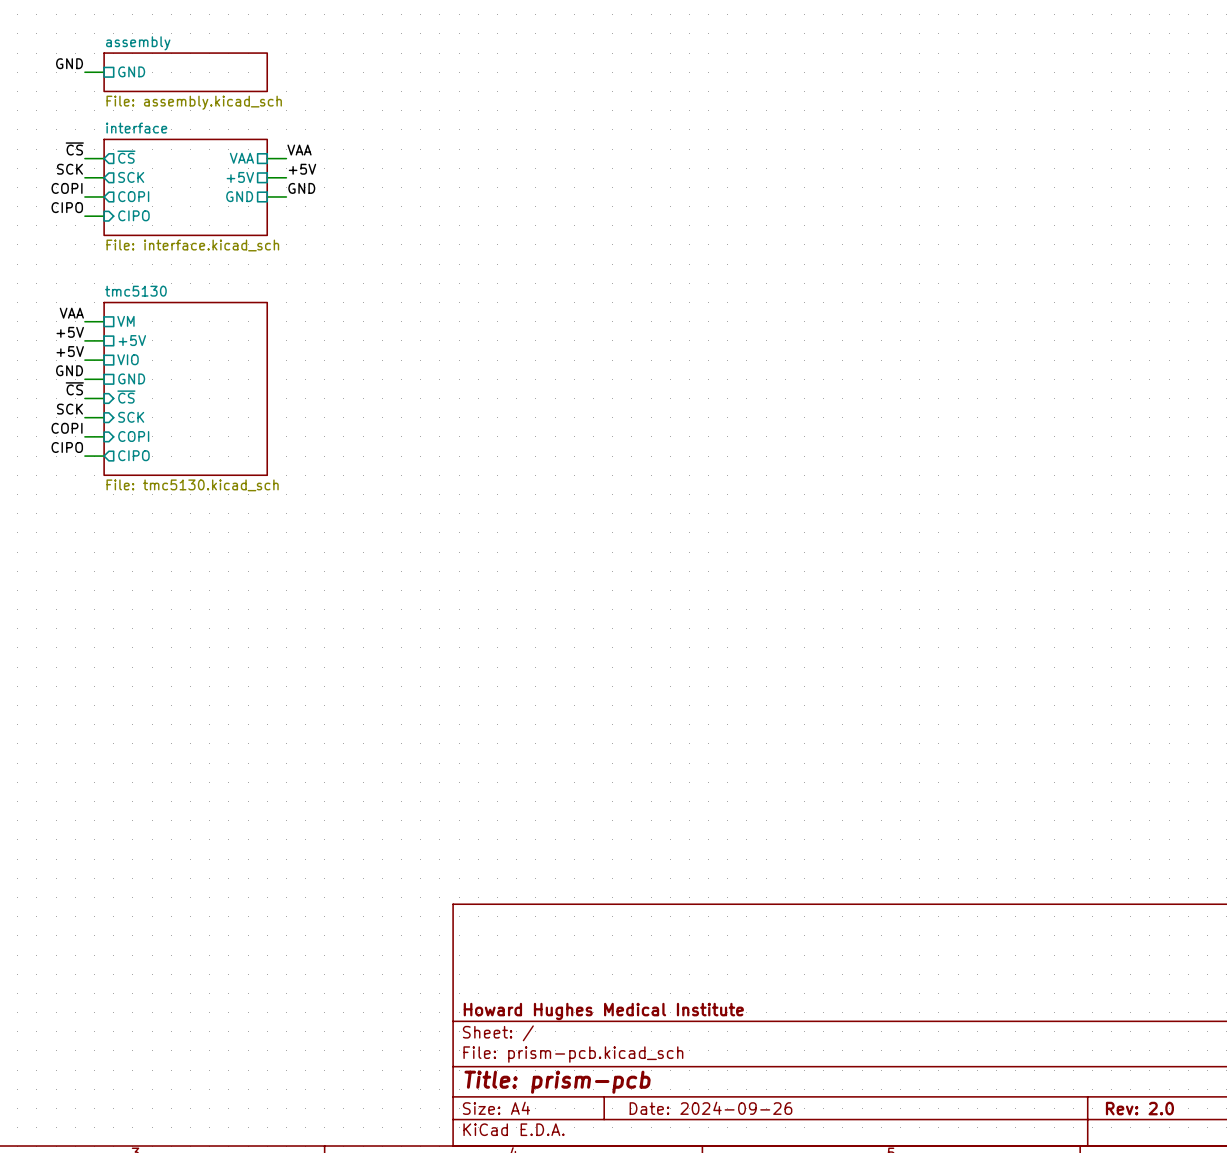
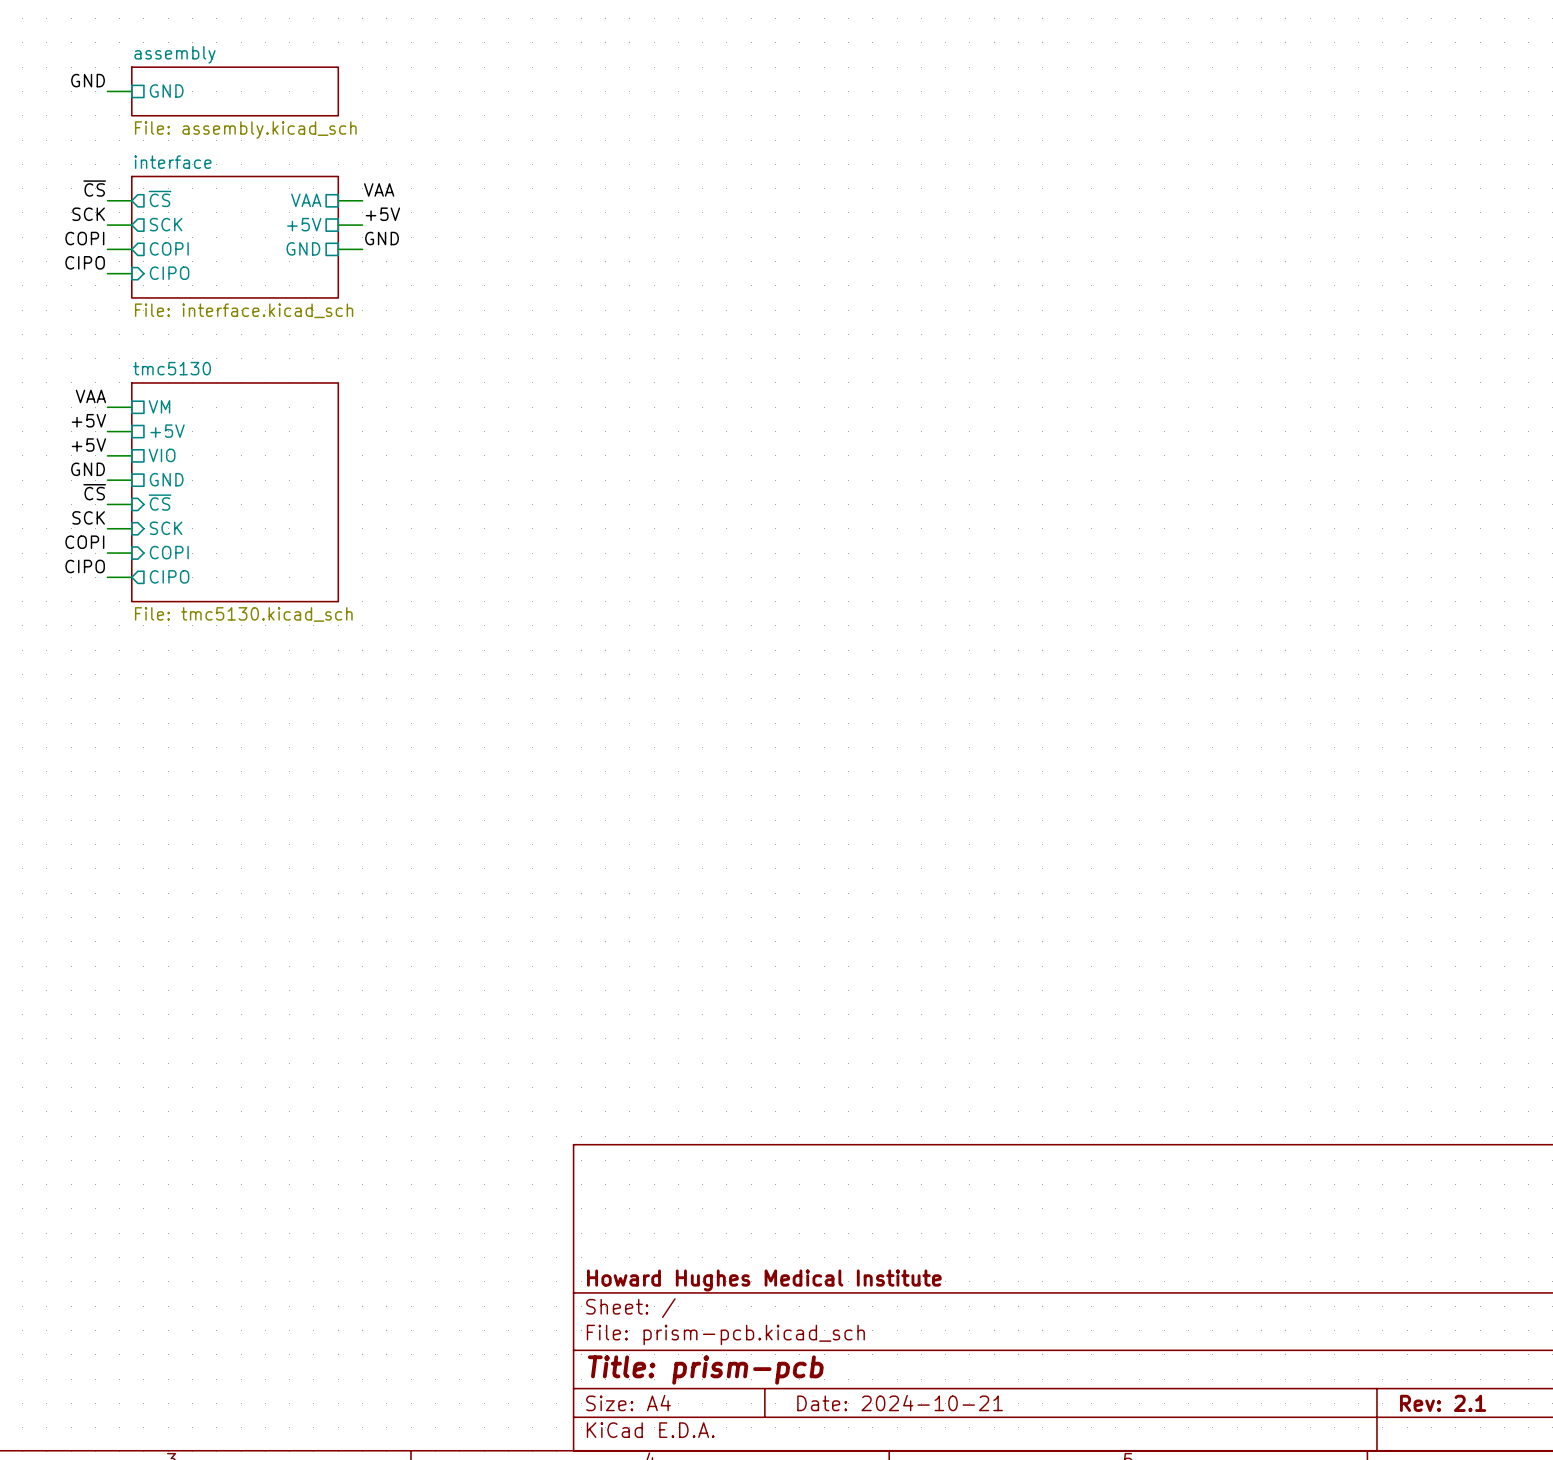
title block: Date: 2024-09-26 (710, 1108) -> Date: 2024-10-21 (900, 1403)
title block: Rev: 2.0 (1139, 1108) -> Rev: 2.1 (1443, 1403)

